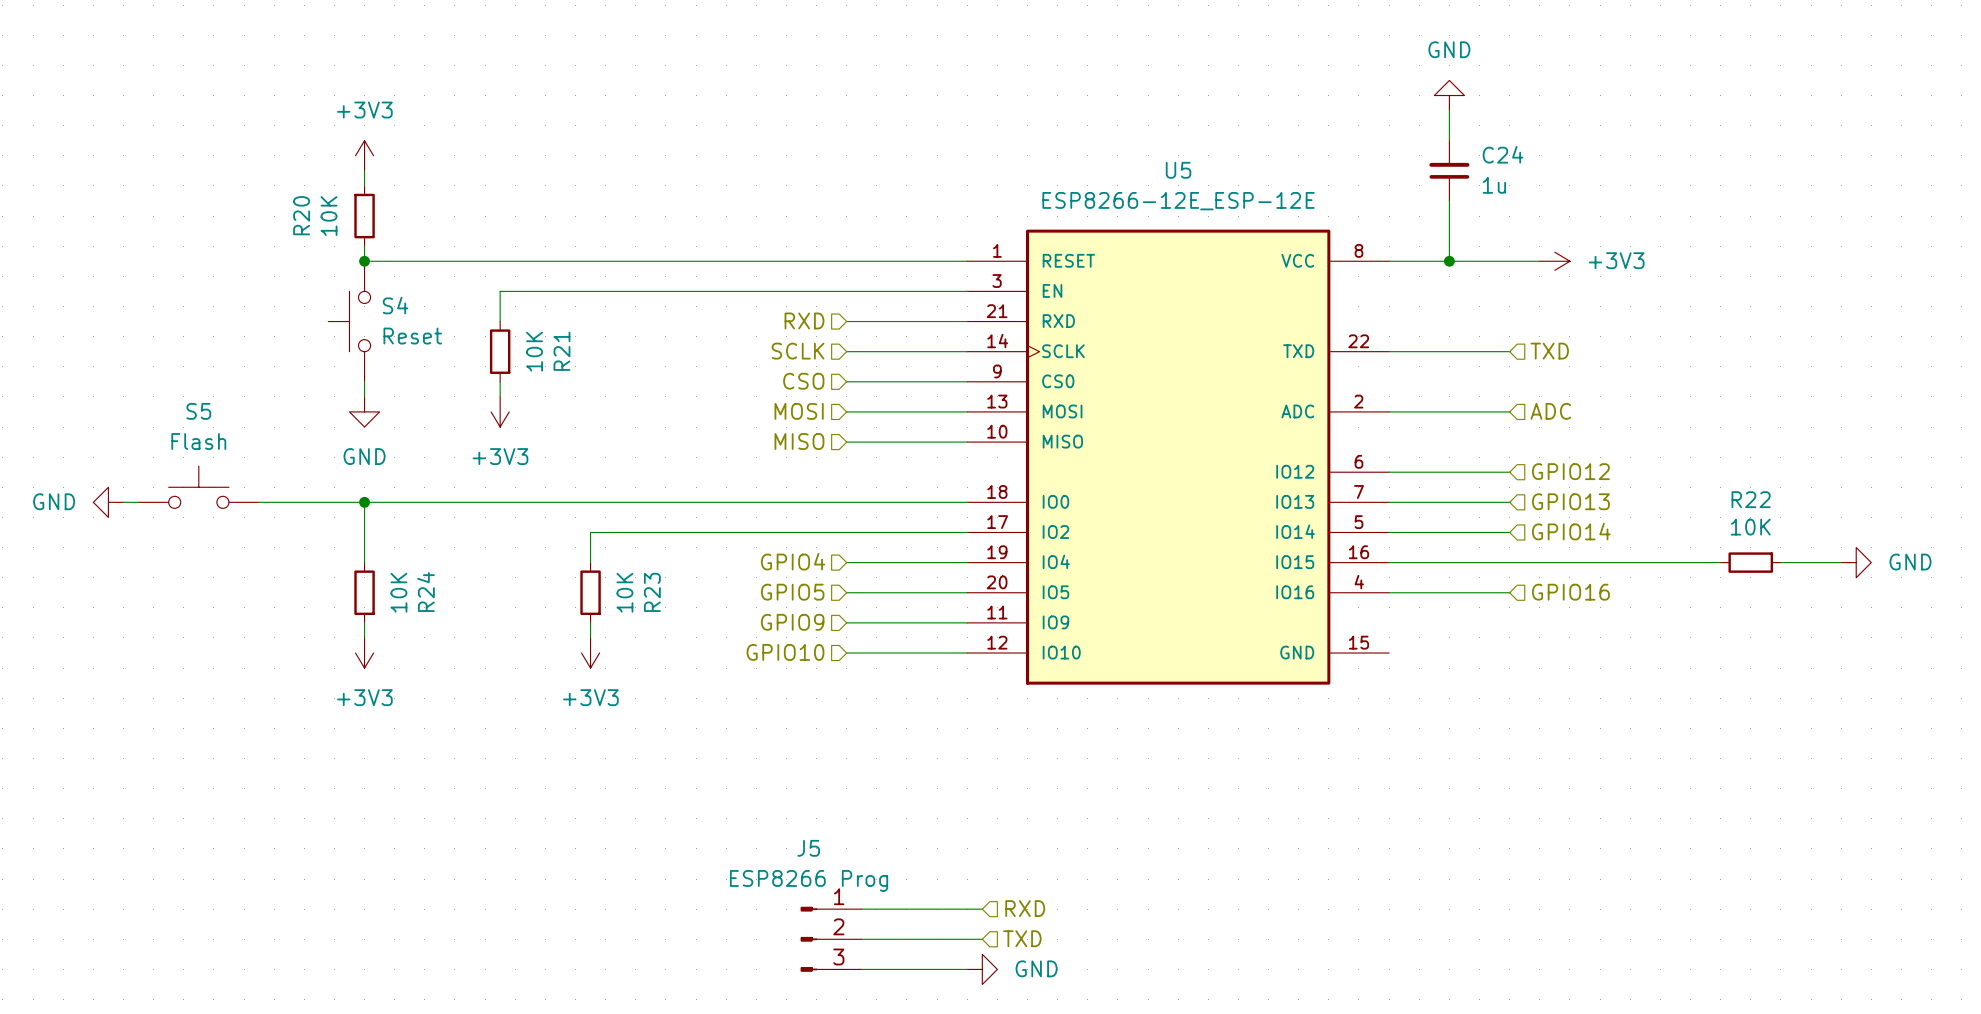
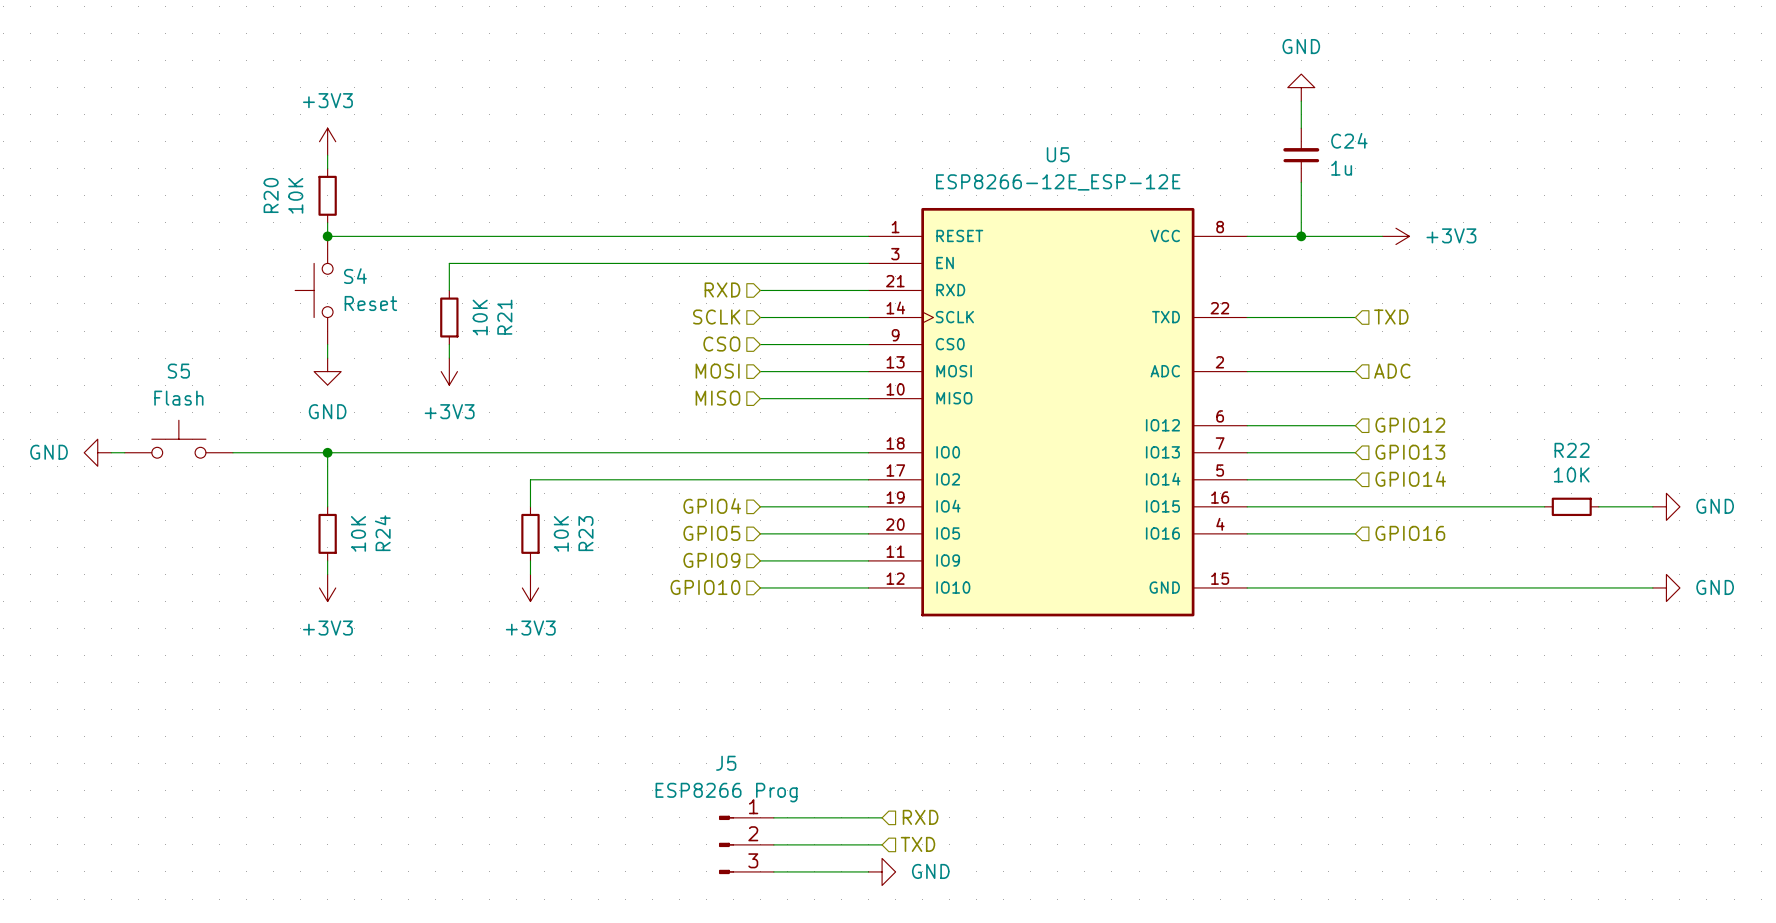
wire: none -> (1247, 587) (1652, 587)
power symbol: none -> GND (1666, 587)

